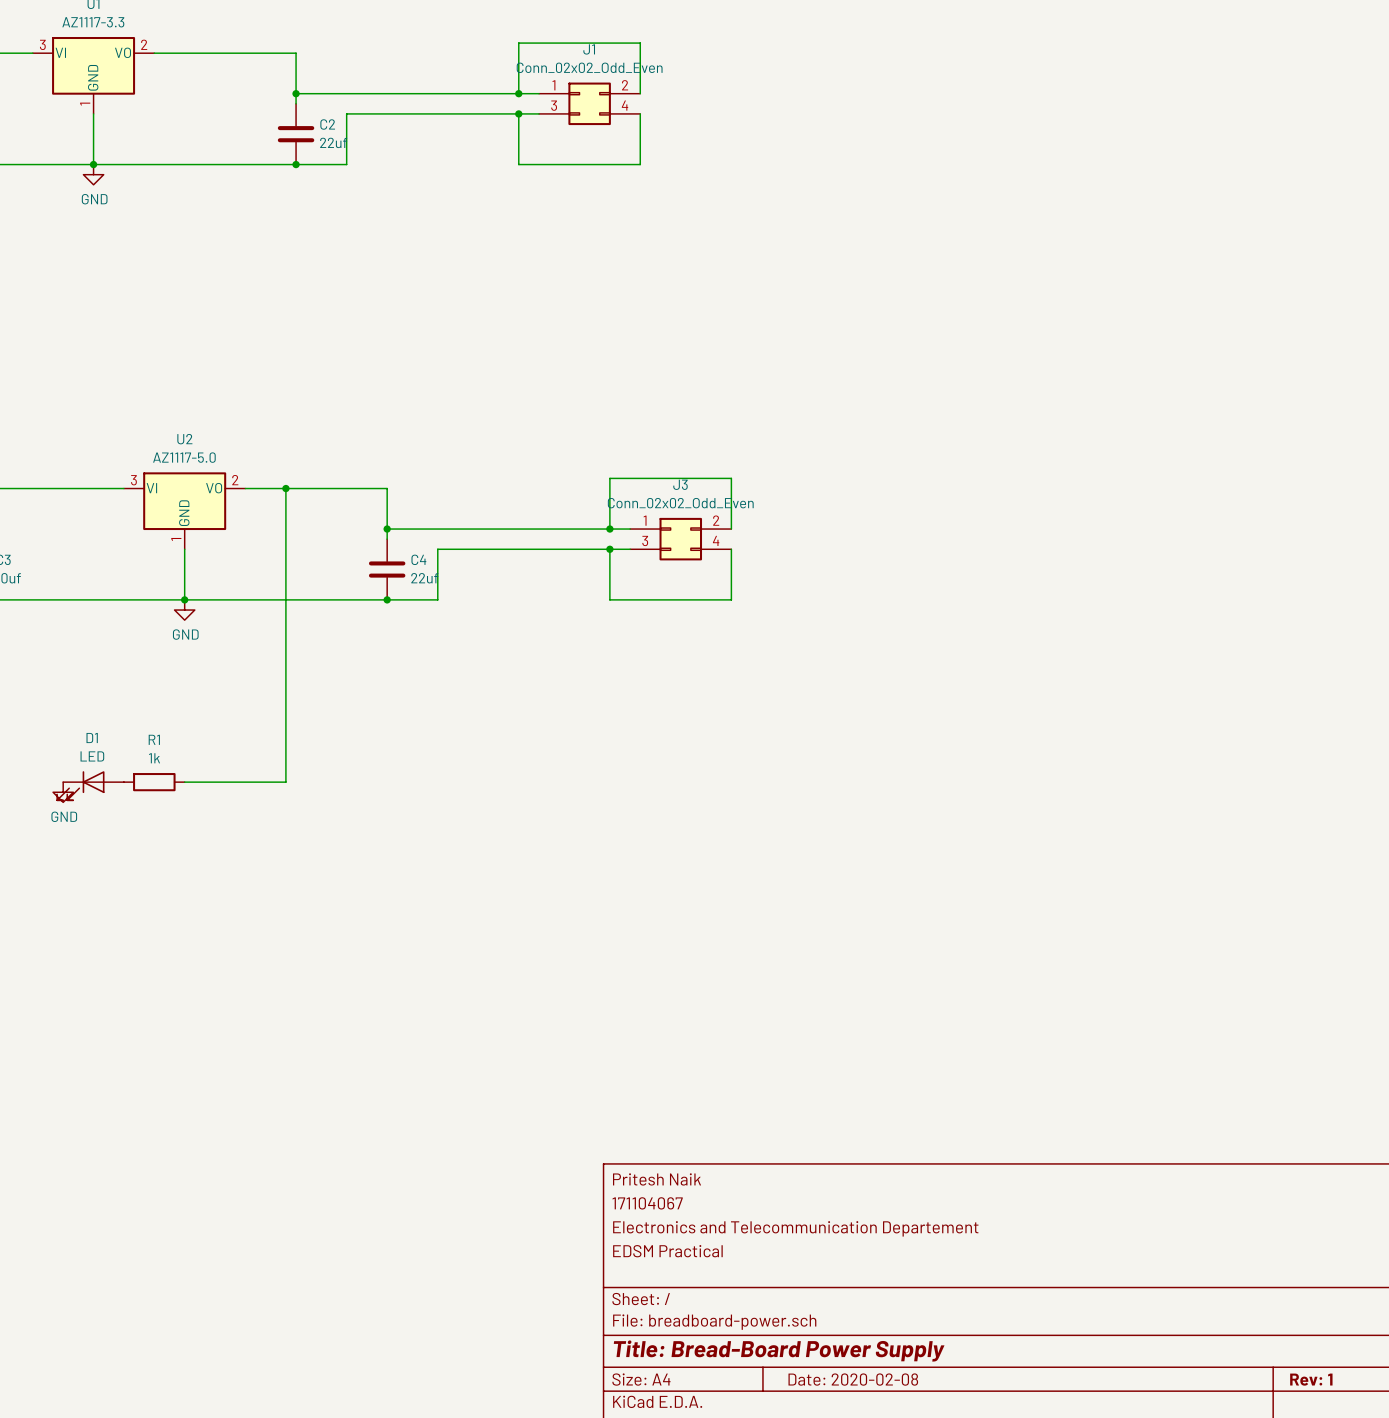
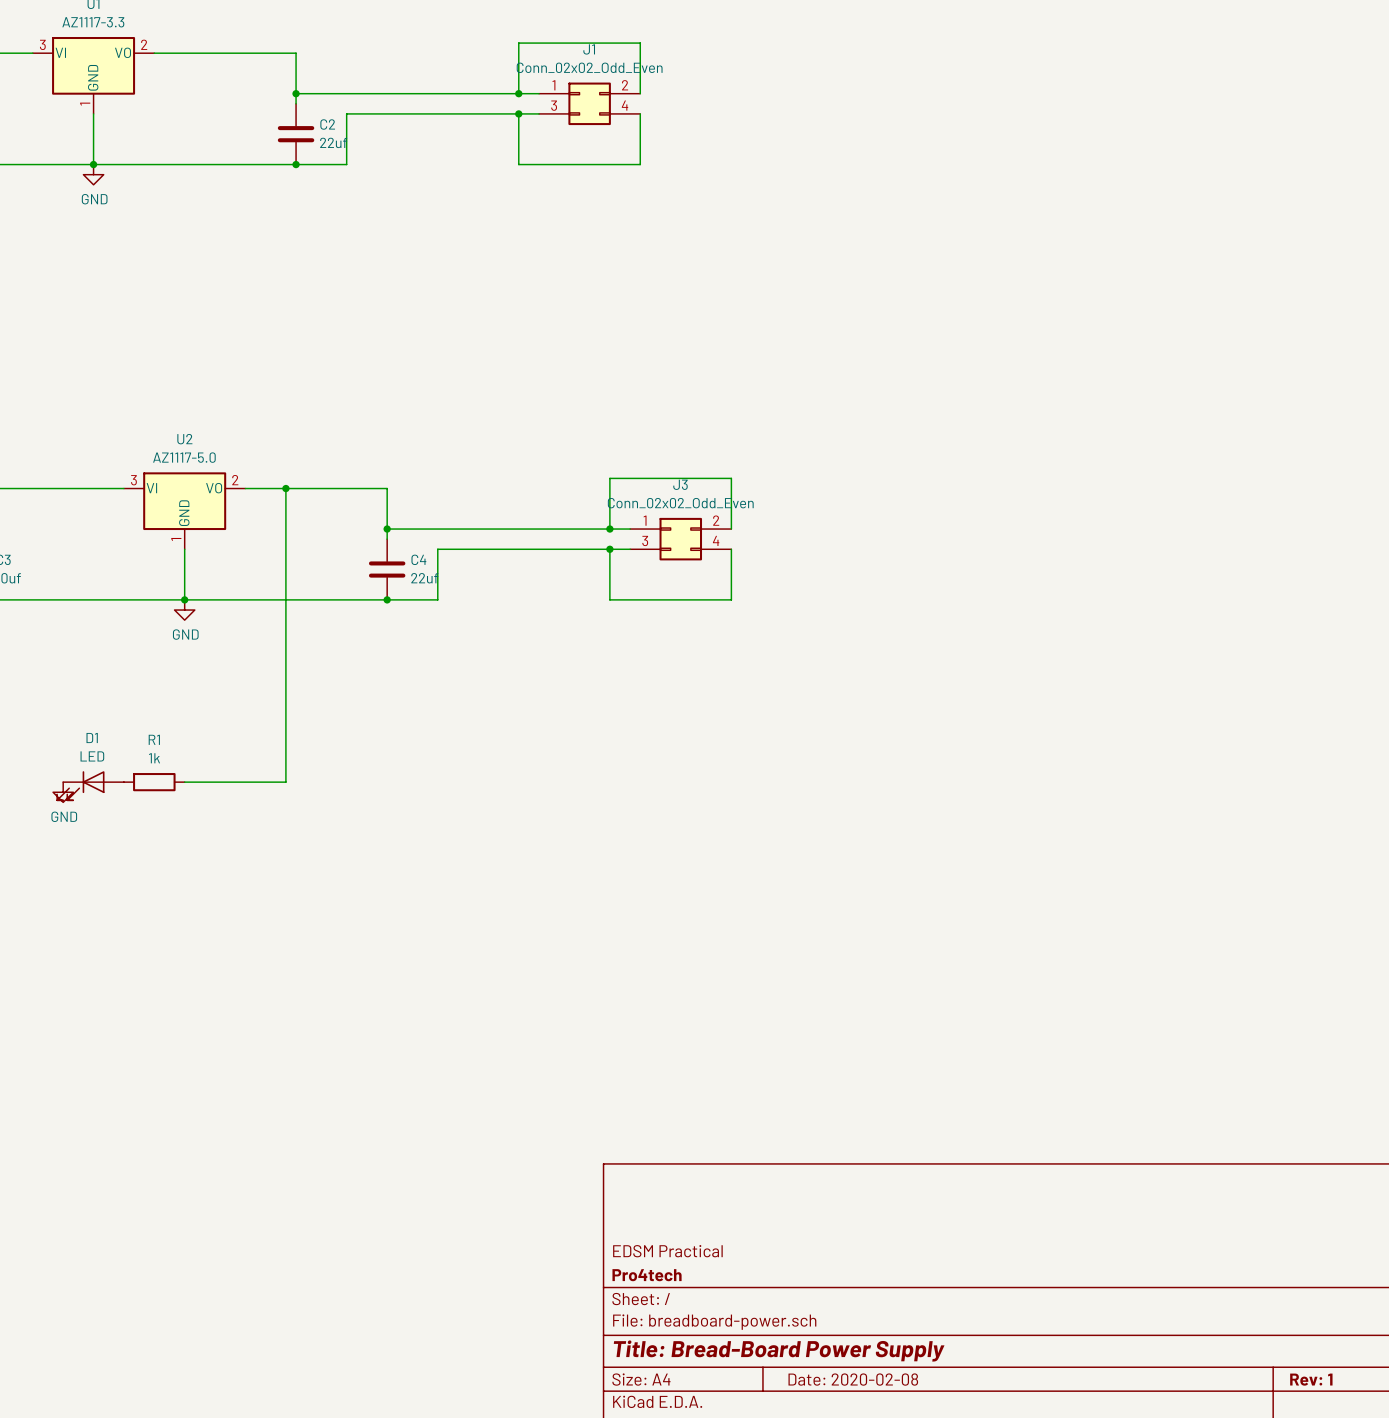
title block: Pritesh Naik (657, 1179) -> none
title block: 171104067 (647, 1203) -> none
title block: Electronics and Telecommunication Departement (795, 1228) -> none
title block: none -> Pro4tech (647, 1275)

